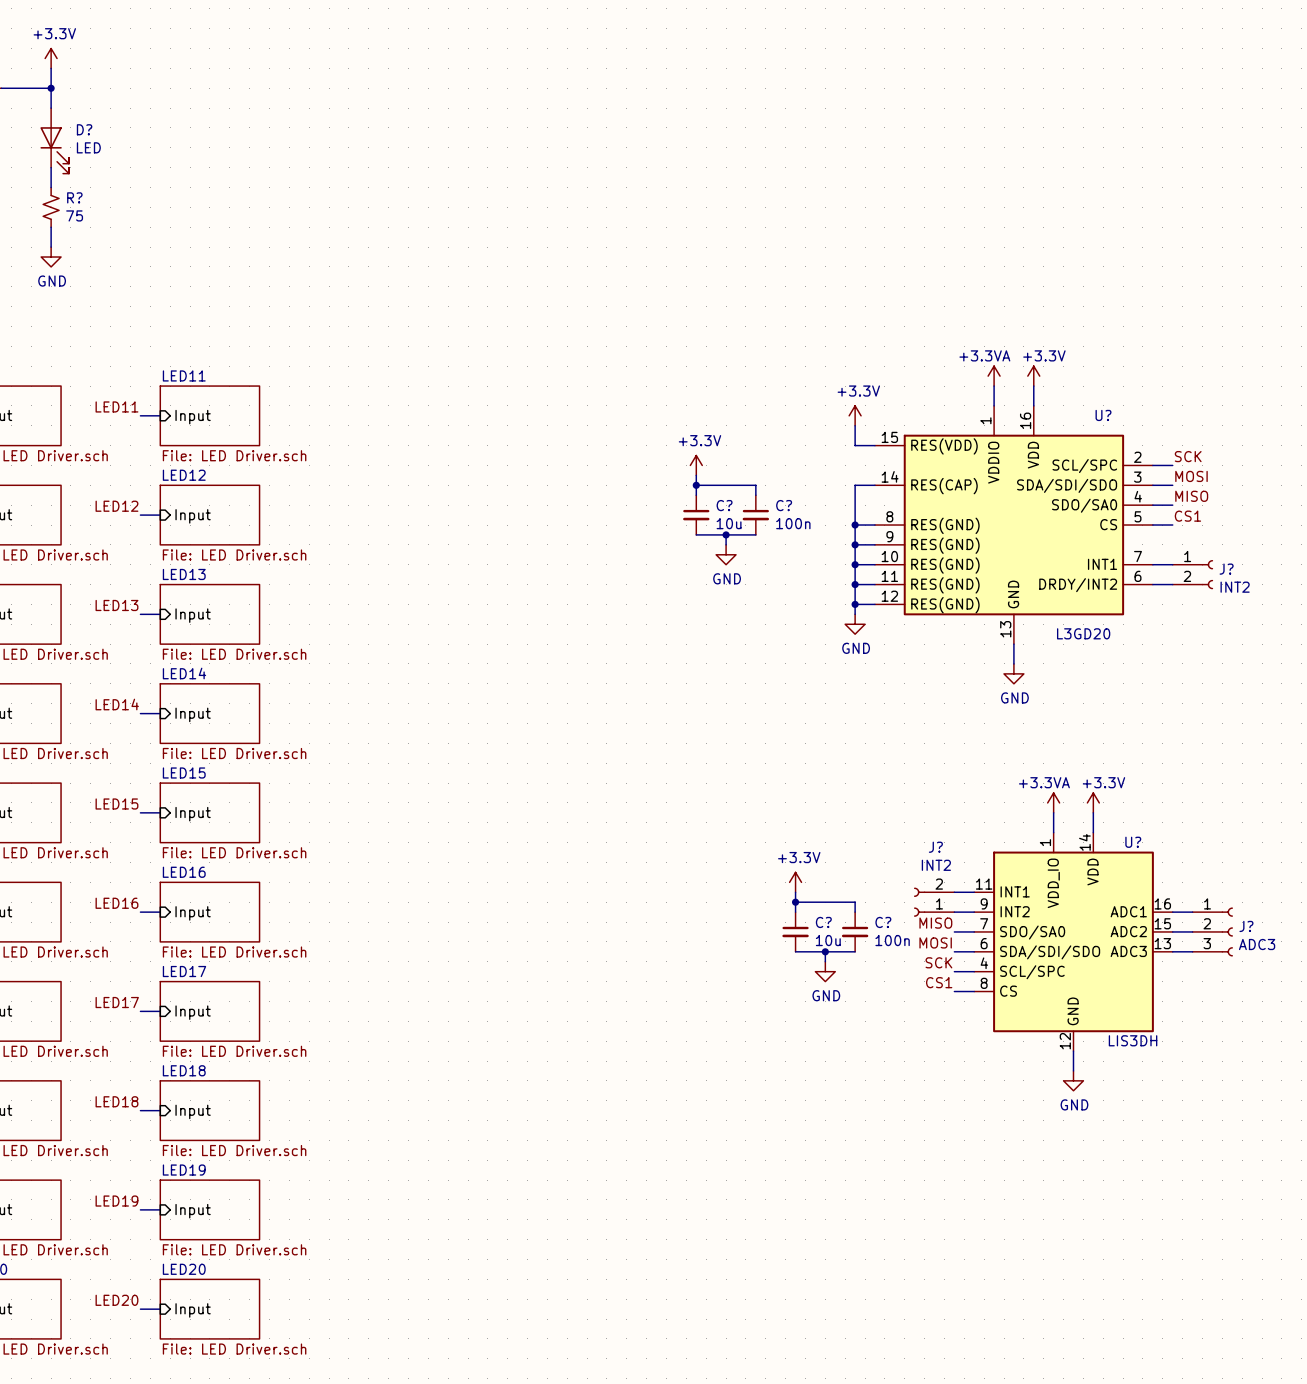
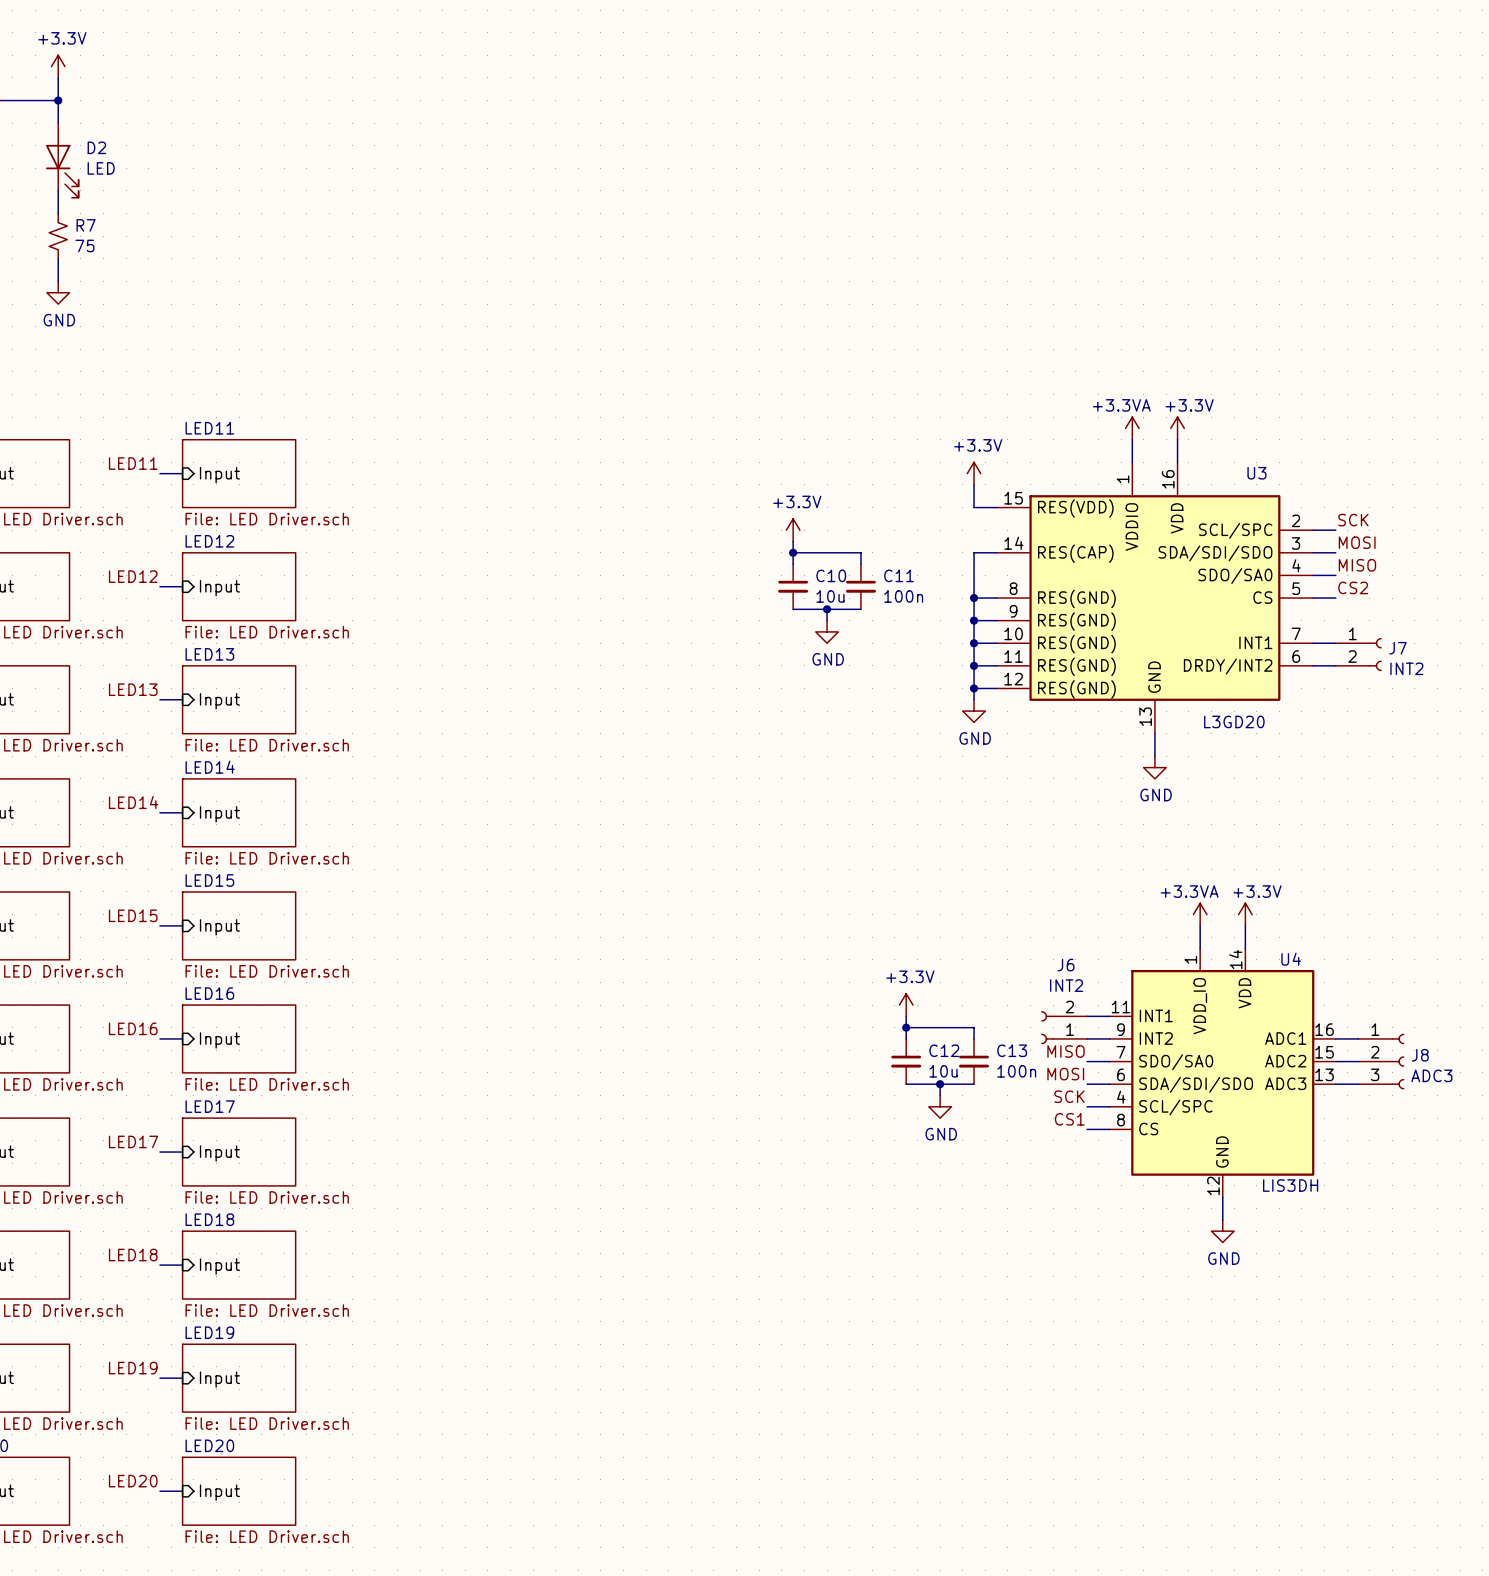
D? name: D? (84, 129) -> D2 (96, 147)
R? name: R? (74, 197) -> R7 (86, 225)
U? name: U? (1103, 415) -> U3 (1256, 473)
C? name: C? (724, 505) -> C10 (831, 575)
C? name: C? (784, 505) -> C11 (899, 575)
label: CS1 (1187, 516) -> CS2 (1353, 587)
J? name: J? (1226, 569) -> J7 (1397, 648)
U? name: U? (1133, 842) -> U4 (1291, 959)
J? name: J? (935, 847) -> J6 (1066, 965)
C? name: C? (823, 922) -> C12 (944, 1050)
C? name: C? (883, 922) -> C13 (1012, 1050)
J? name: J? (1246, 926) -> J8 (1420, 1055)

